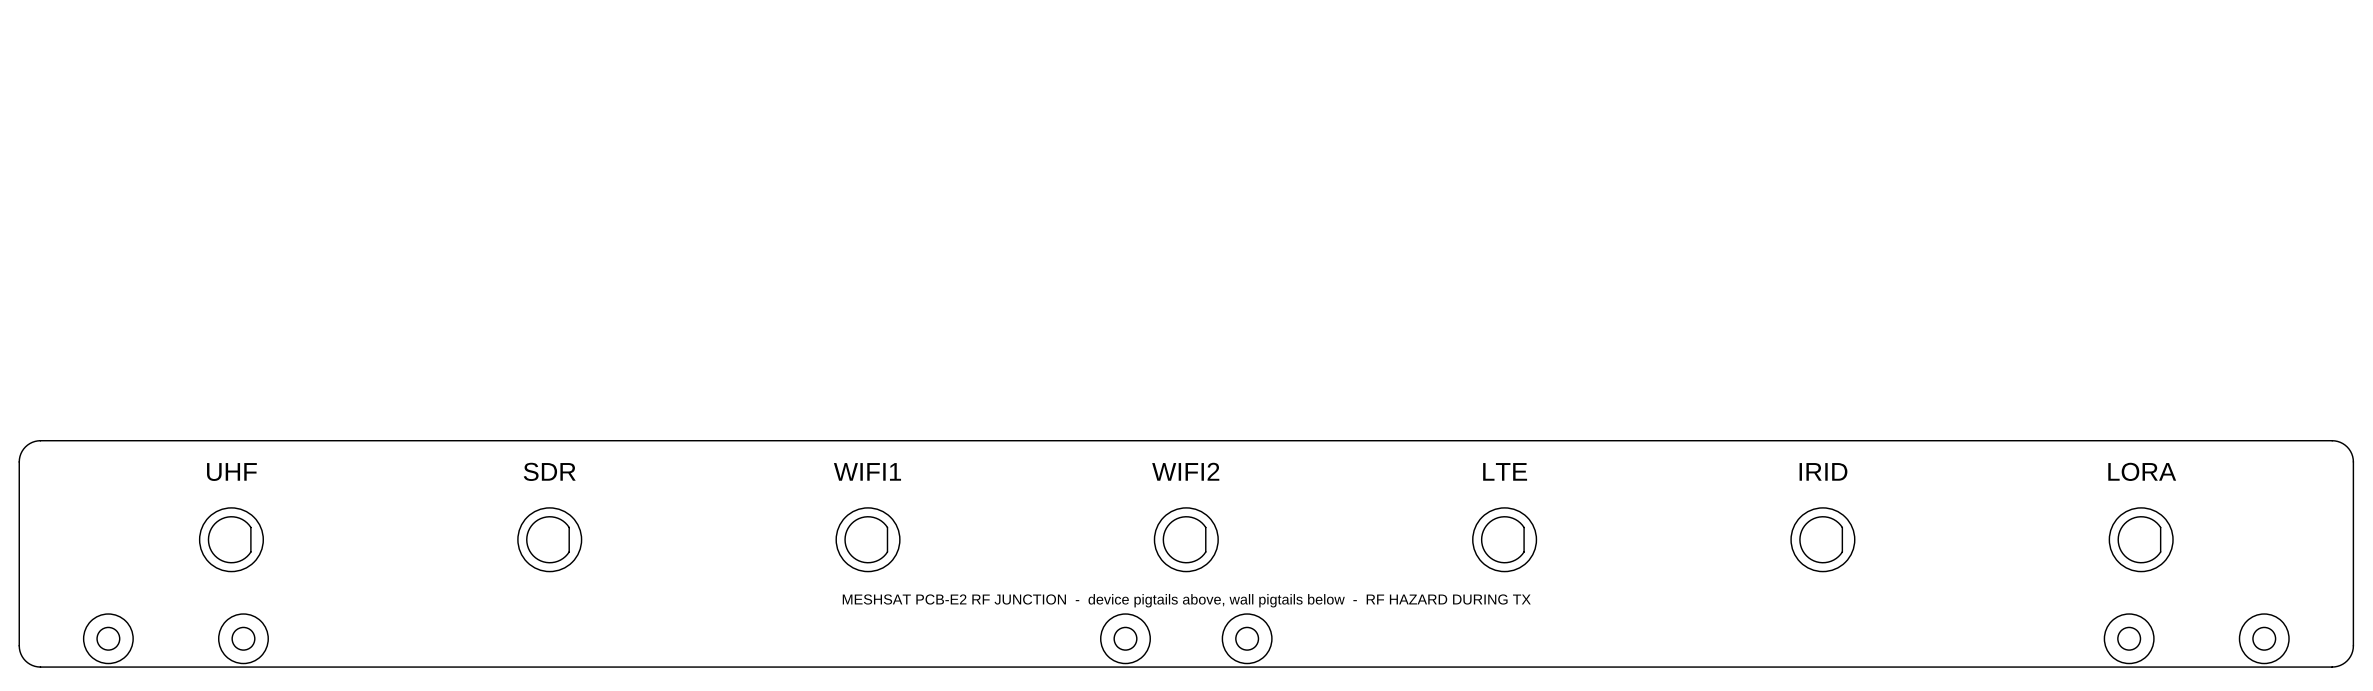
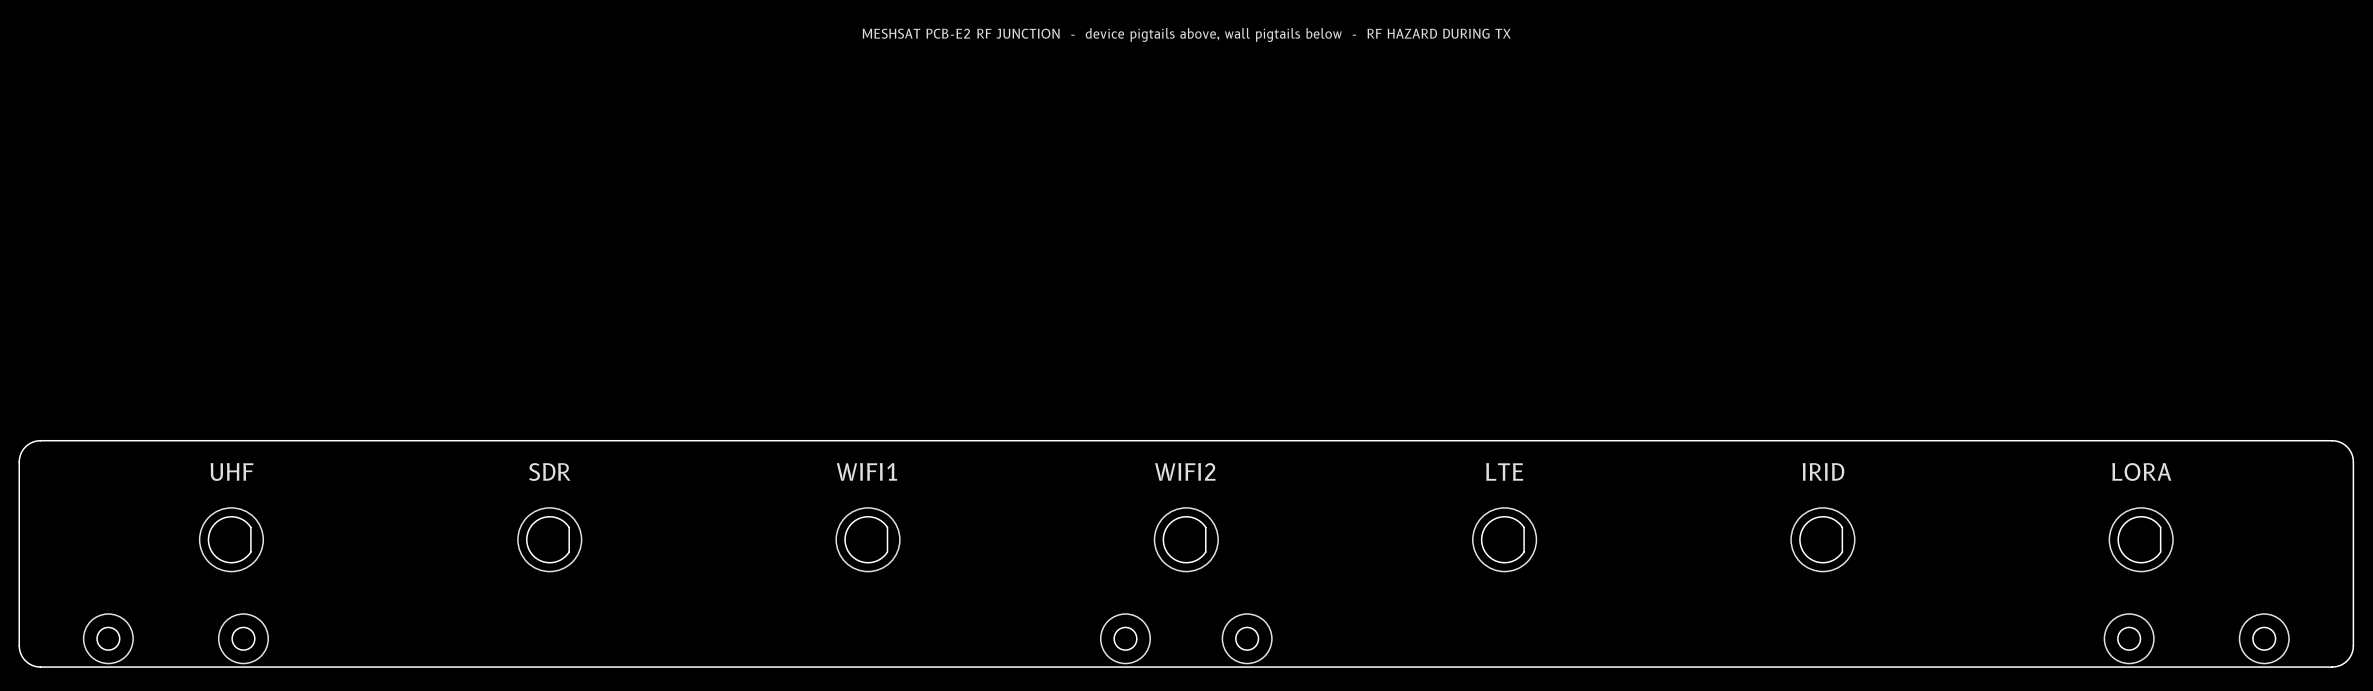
text: none -> MESHSAT PCB-E2 RF JUNCTION - device pigtails above, wall pigtails below - RF HAZARD DURING TX (1186, 35)
text: MESHSAT PCB-E2 RF JUNCTION - device pigtails above, wall pigtails below - RF HAZARD DURING TX (1186, 600) -> none

